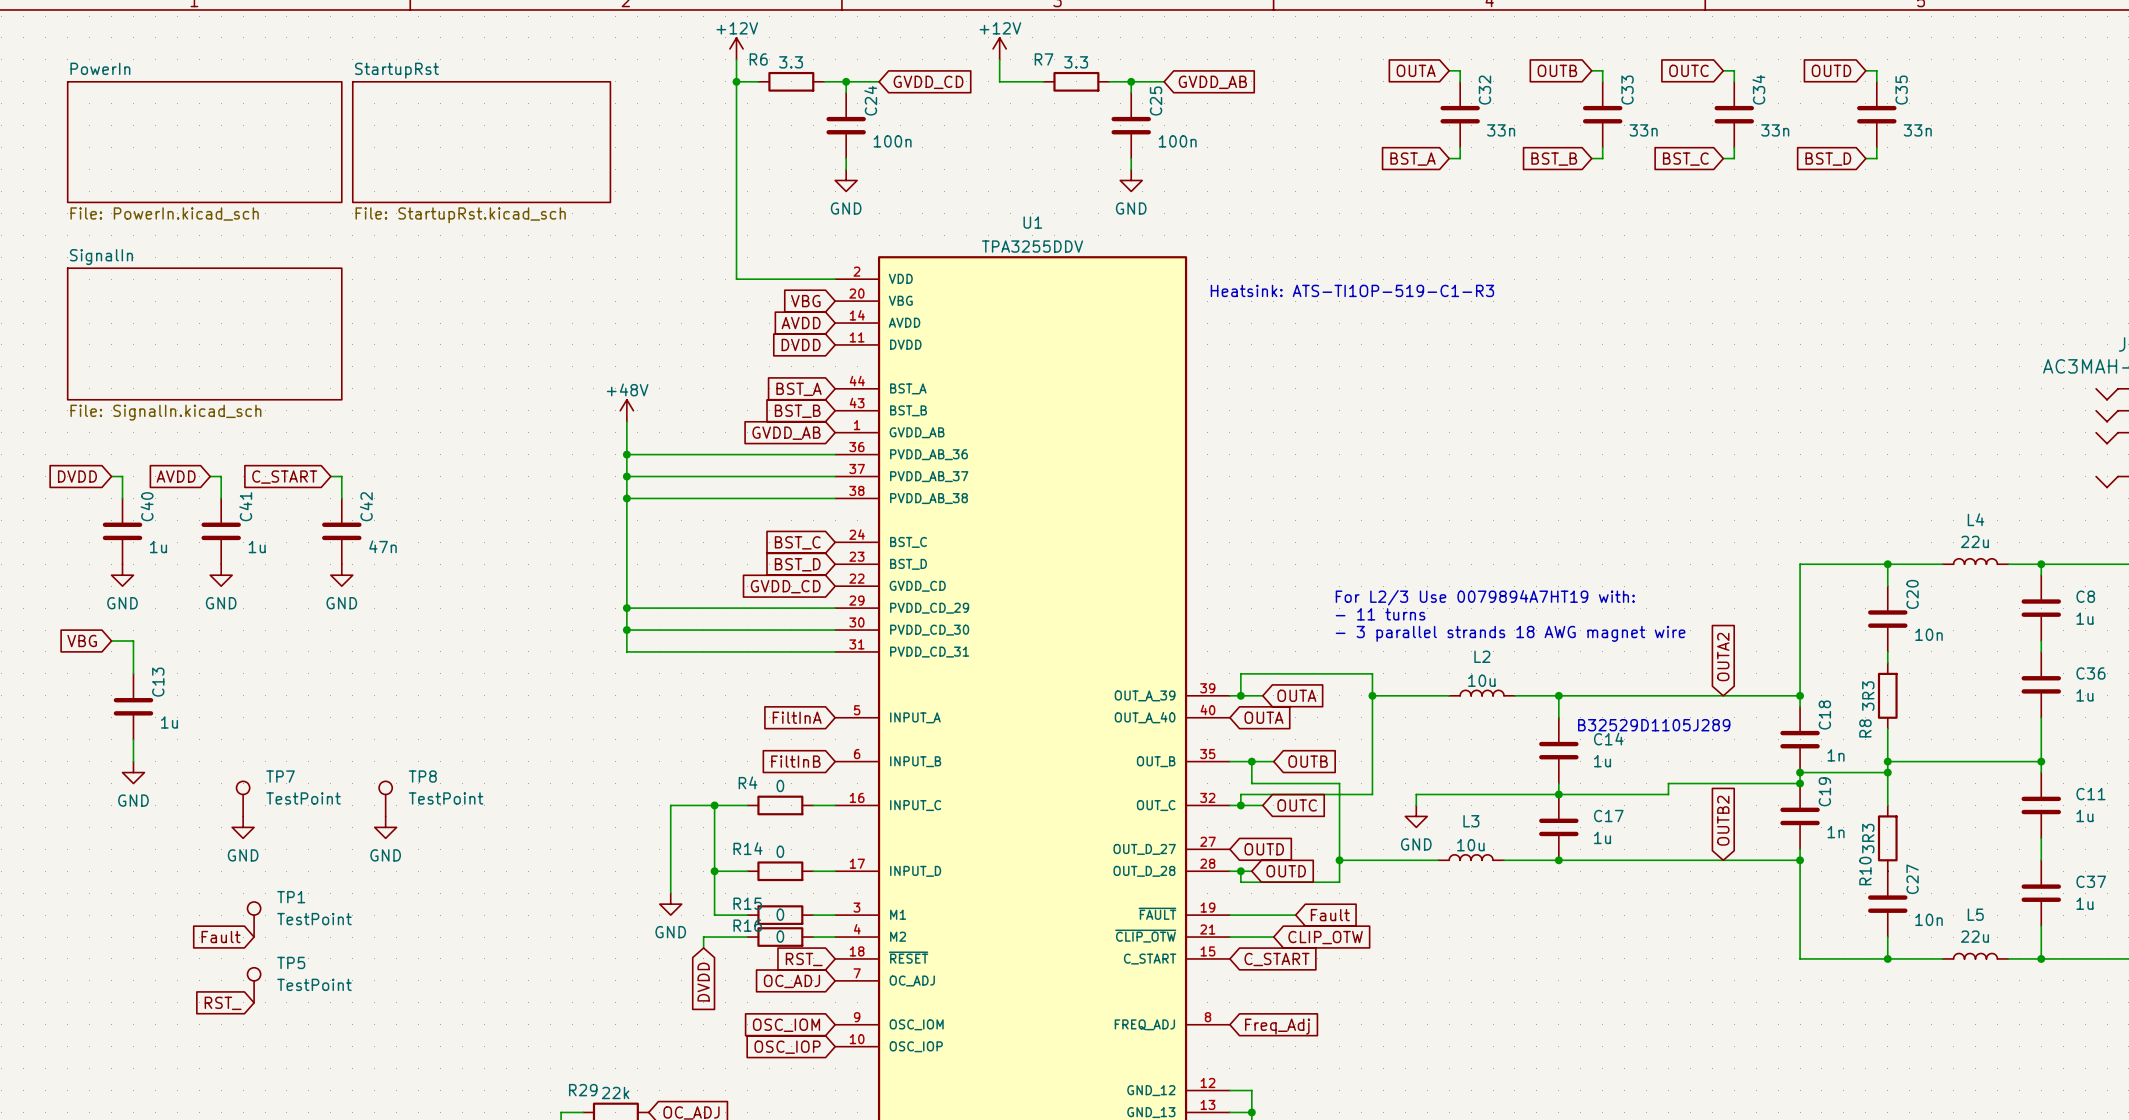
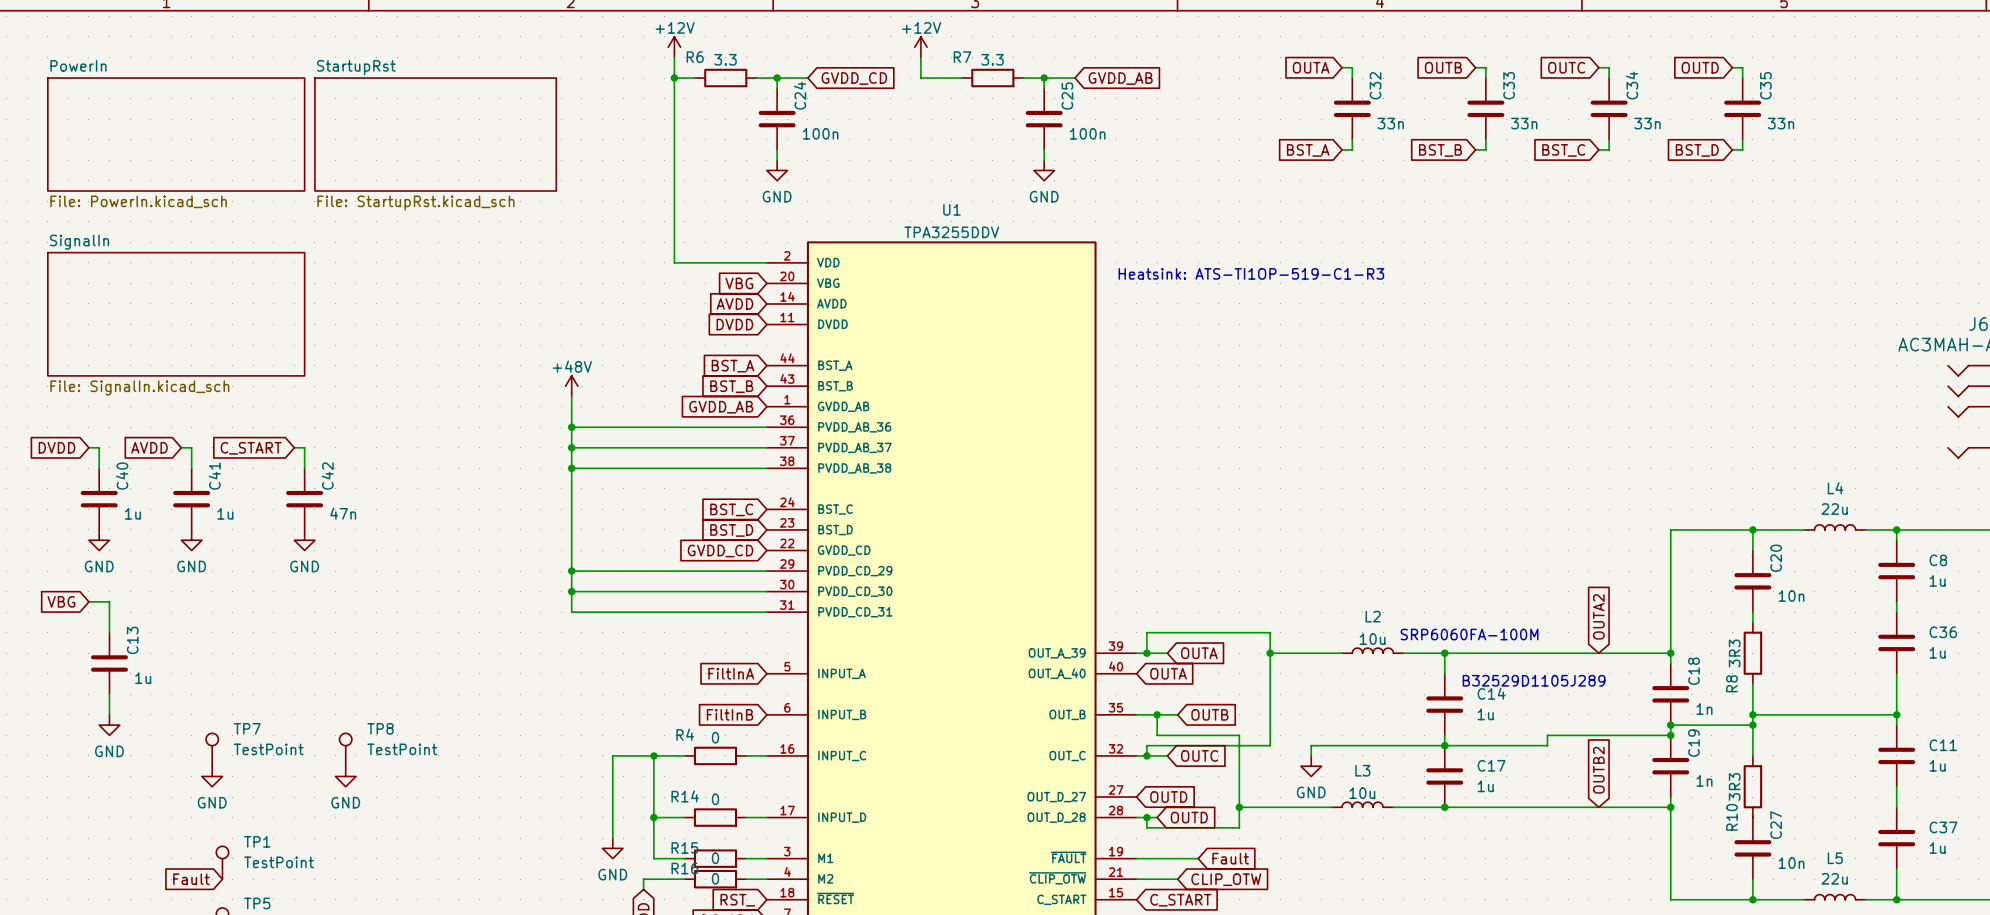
text: For L2/3 Use 0079894A7HT19 with: (1485, 597) -> none
text: - 11 turns (1380, 614) -> none
text: - 3 parallel strands 18 AWG magnet wire (1510, 633) -> none
text: none -> SRP6060FA-100M (1469, 634)

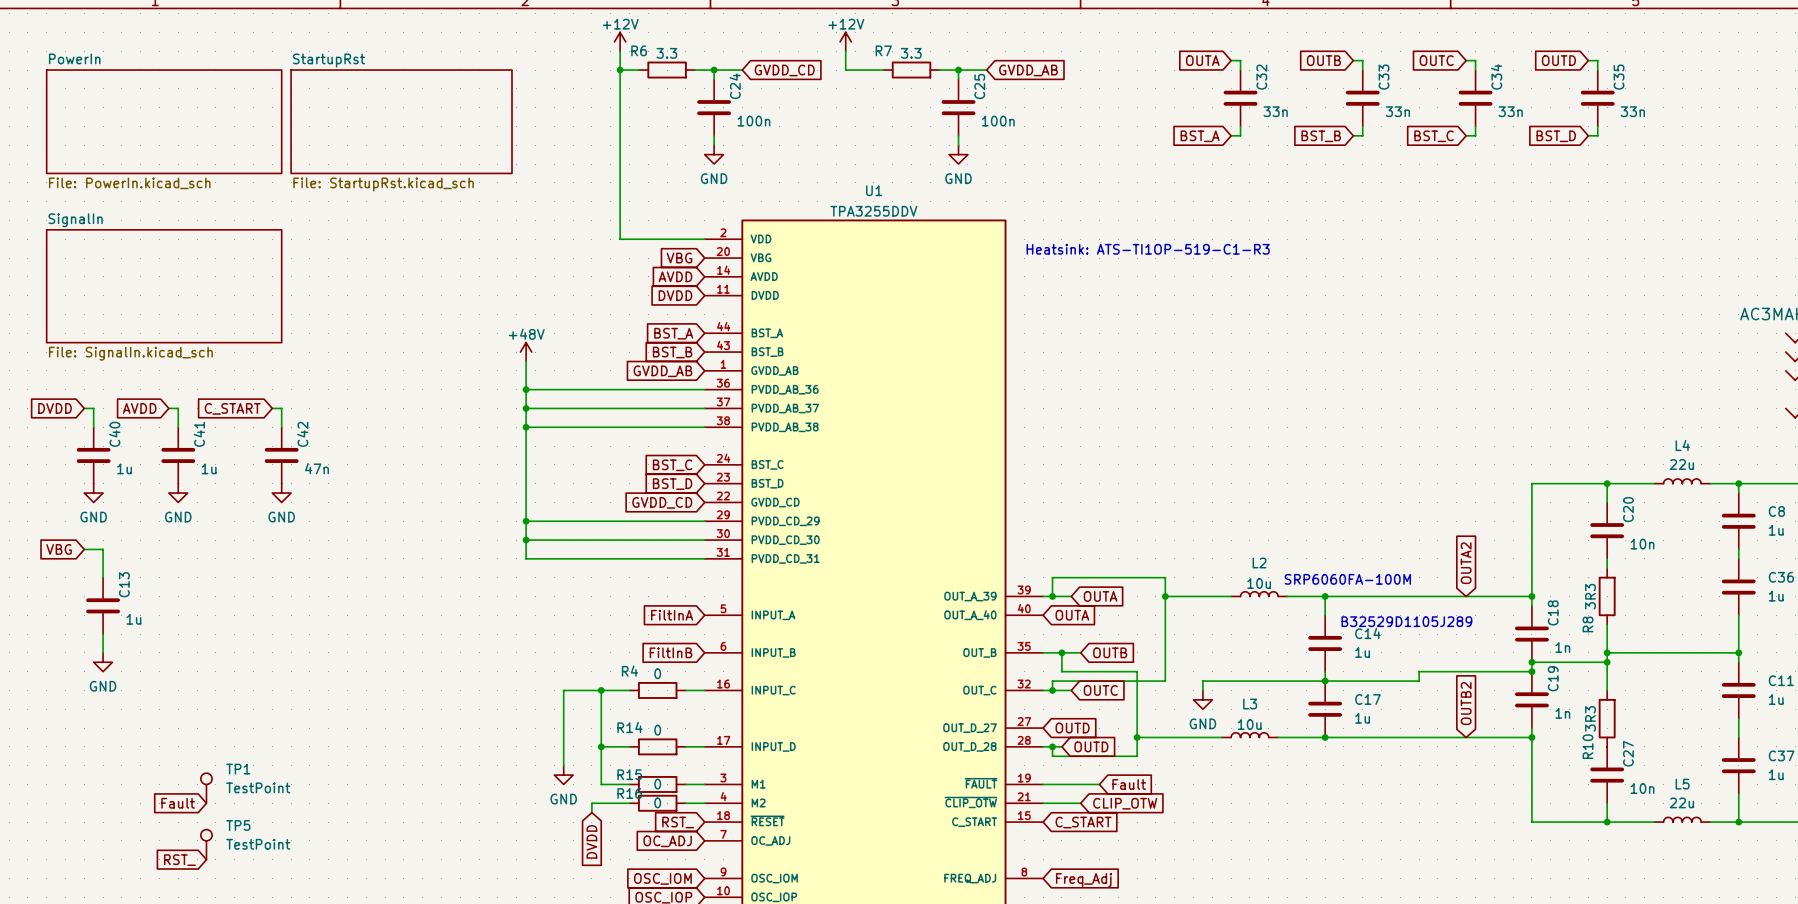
TP7: TestPoint (212, 749) -> none
TP8: TestPoint (345, 749) -> none
power symbol: GND (212, 776) -> none
power symbol: GND (345, 776) -> none

